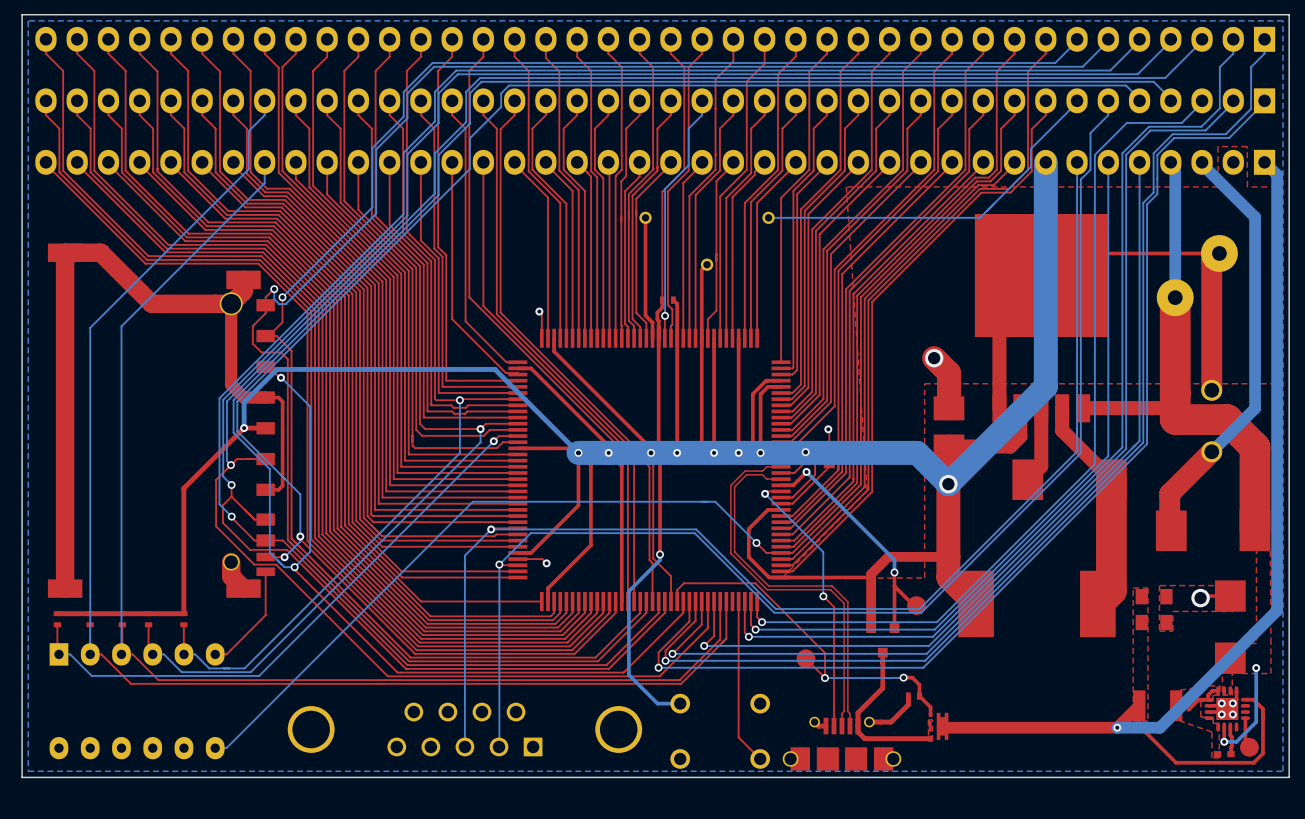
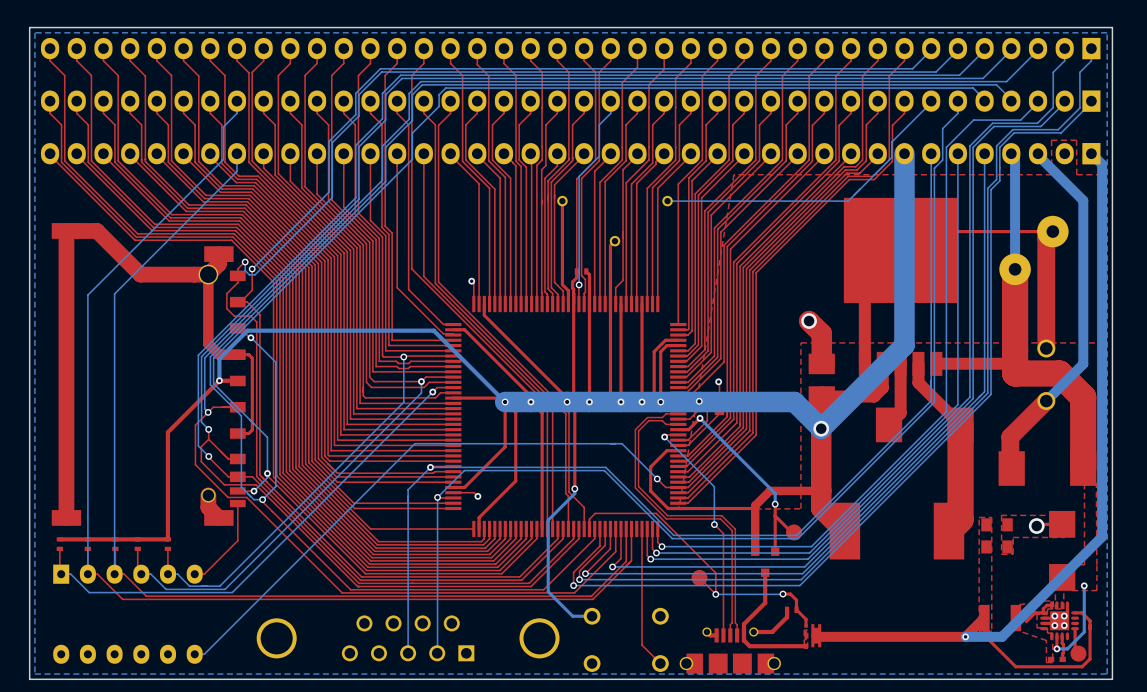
top zone outline: (846, 186) (867, 490) (781, 578) -> (733, 174) (678, 509)

